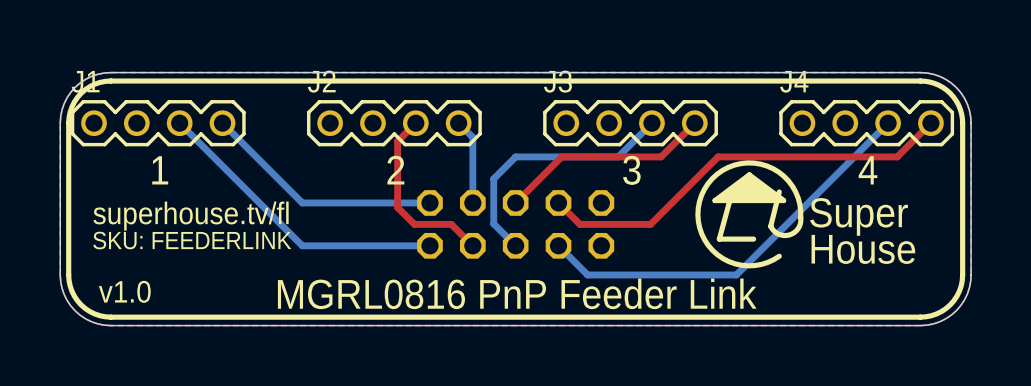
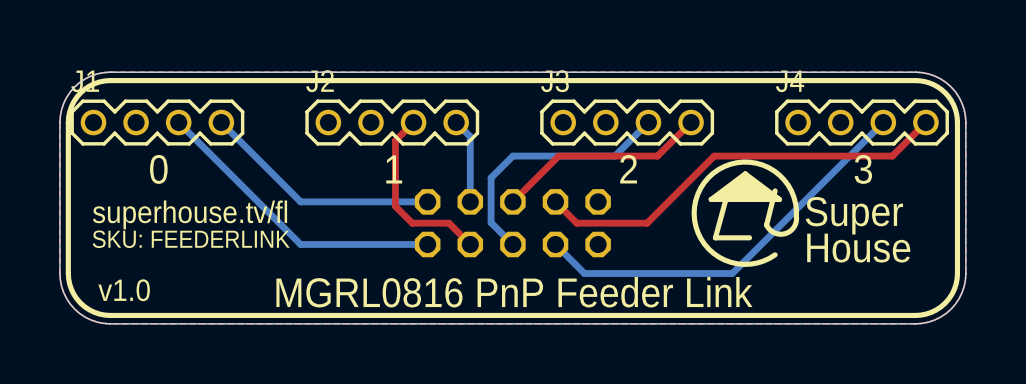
text: 1 (160, 170) -> 0 (158, 169)
text: 2 (395, 170) -> 1 (394, 169)
text: 3 (631, 170) -> 2 (628, 169)
text: 4 (868, 170) -> 3 (863, 169)

